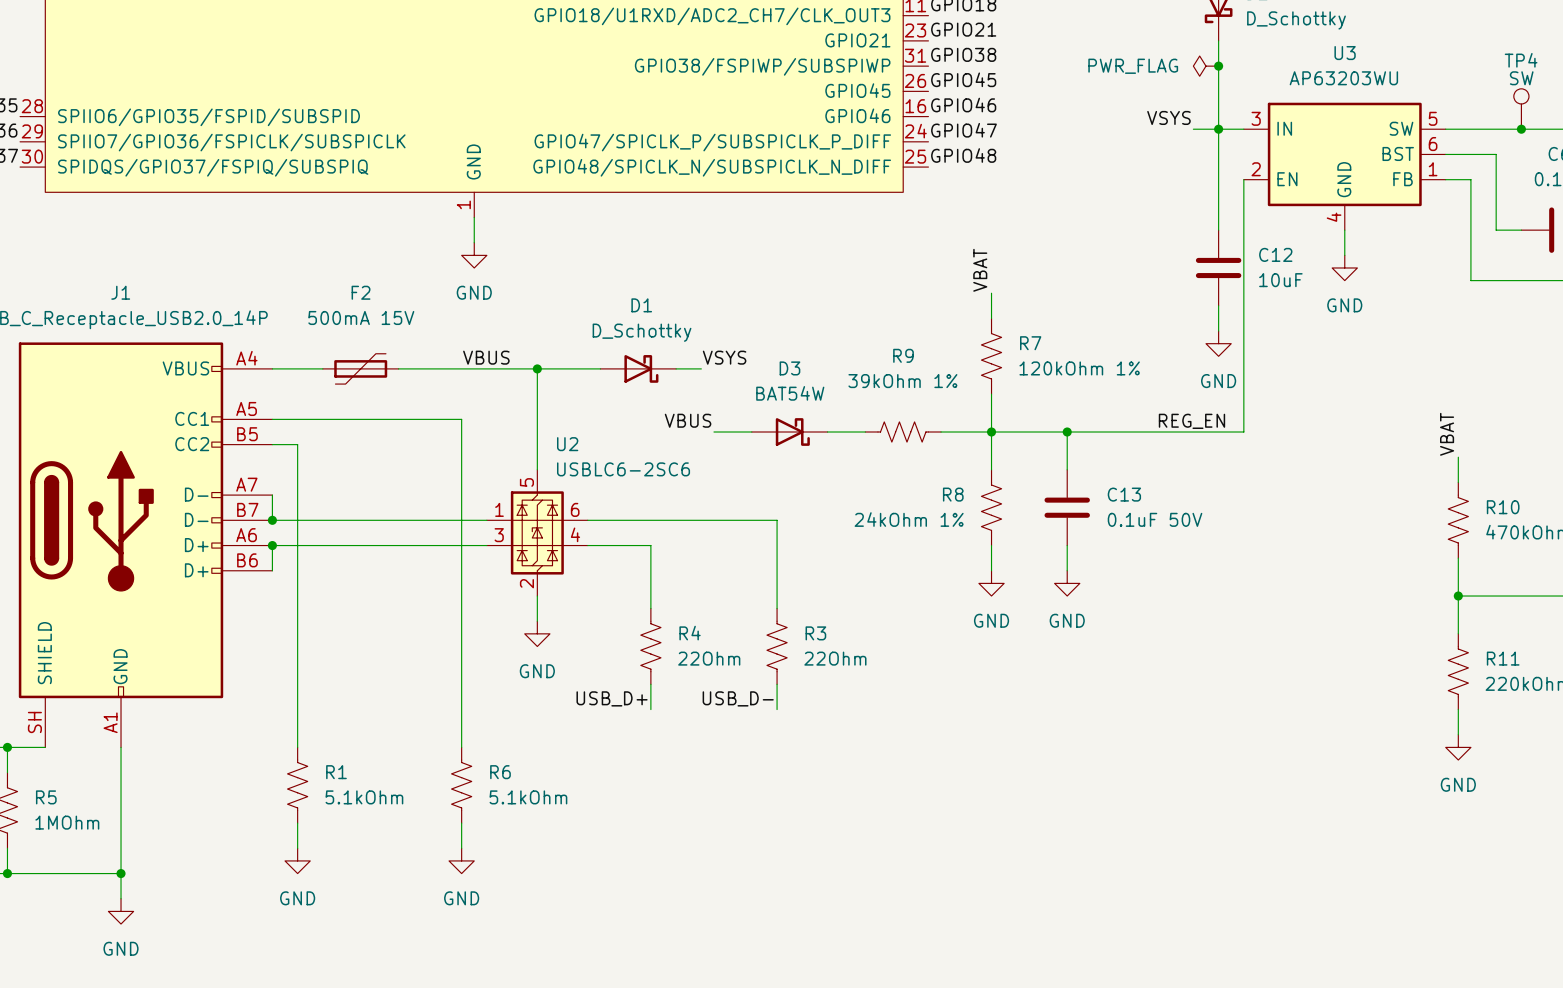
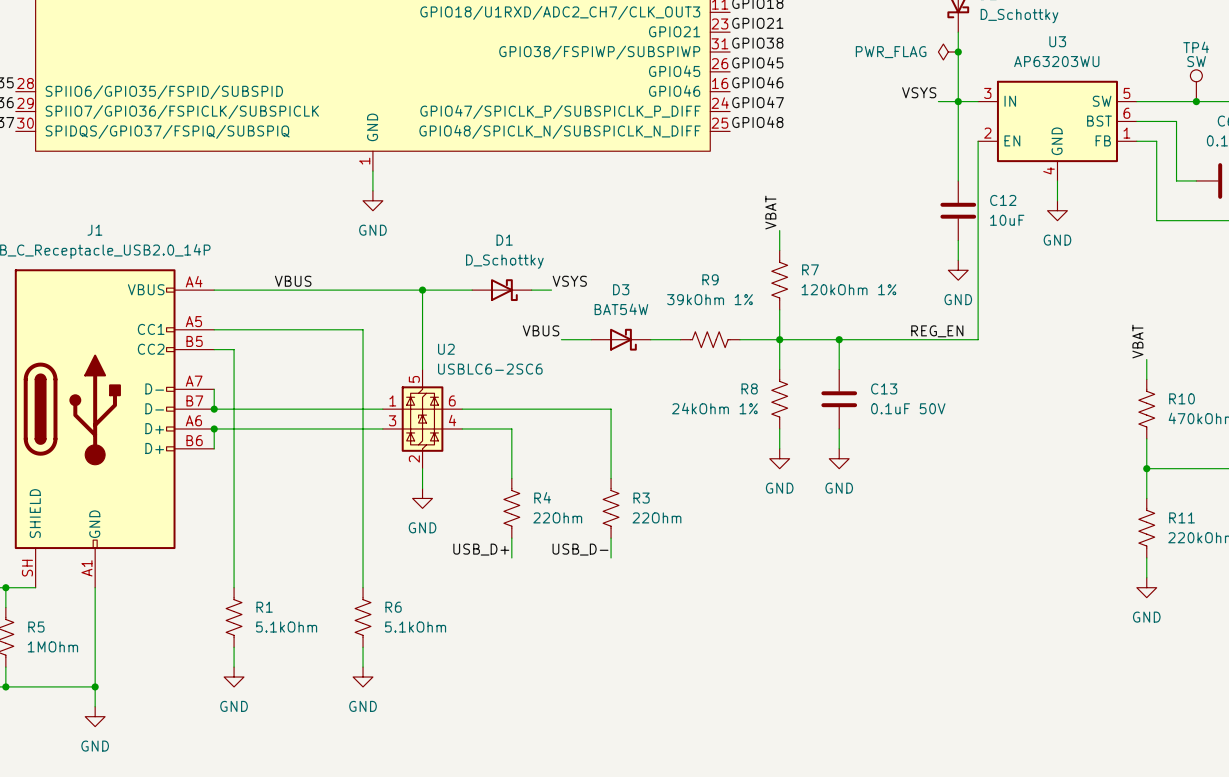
label position: VBUS (486, 357) -> VBUS (293, 281)
F2: 500mA 15V (360, 368) -> none

